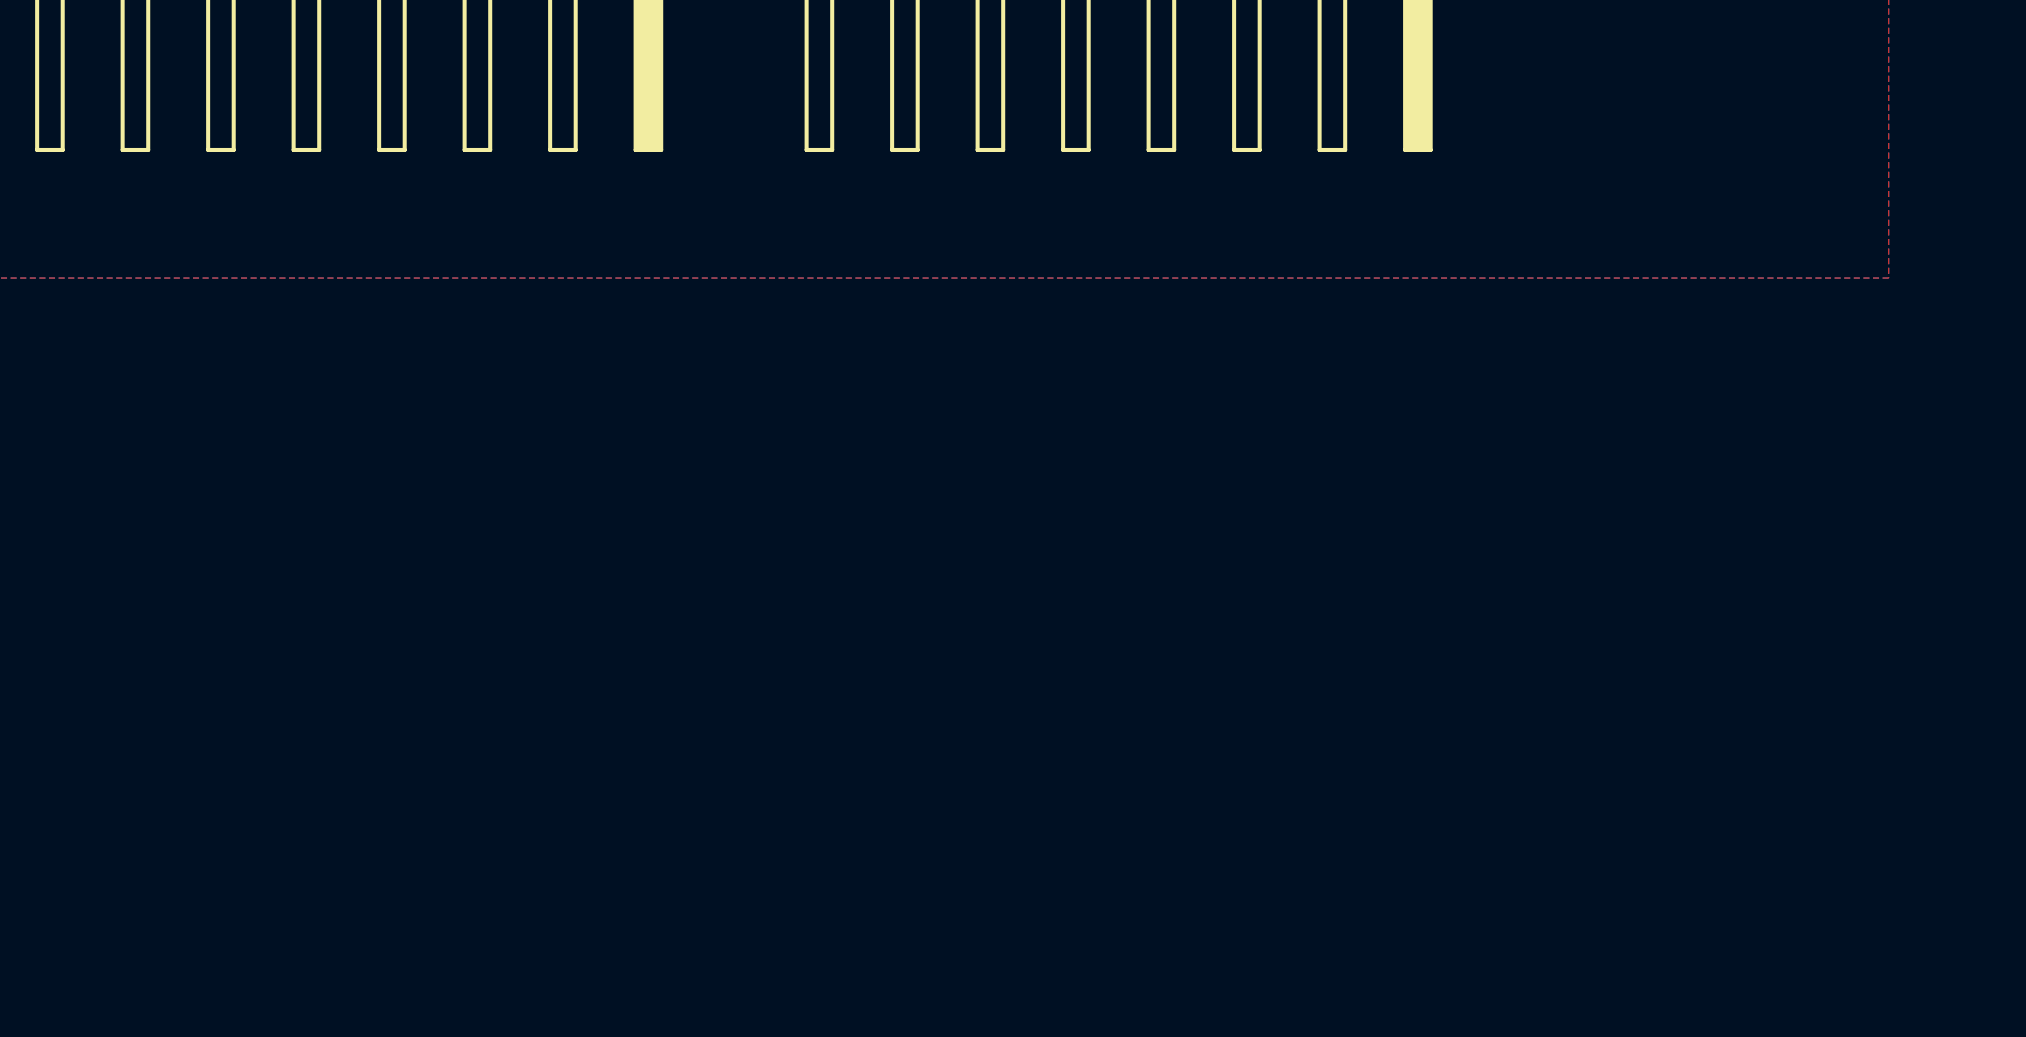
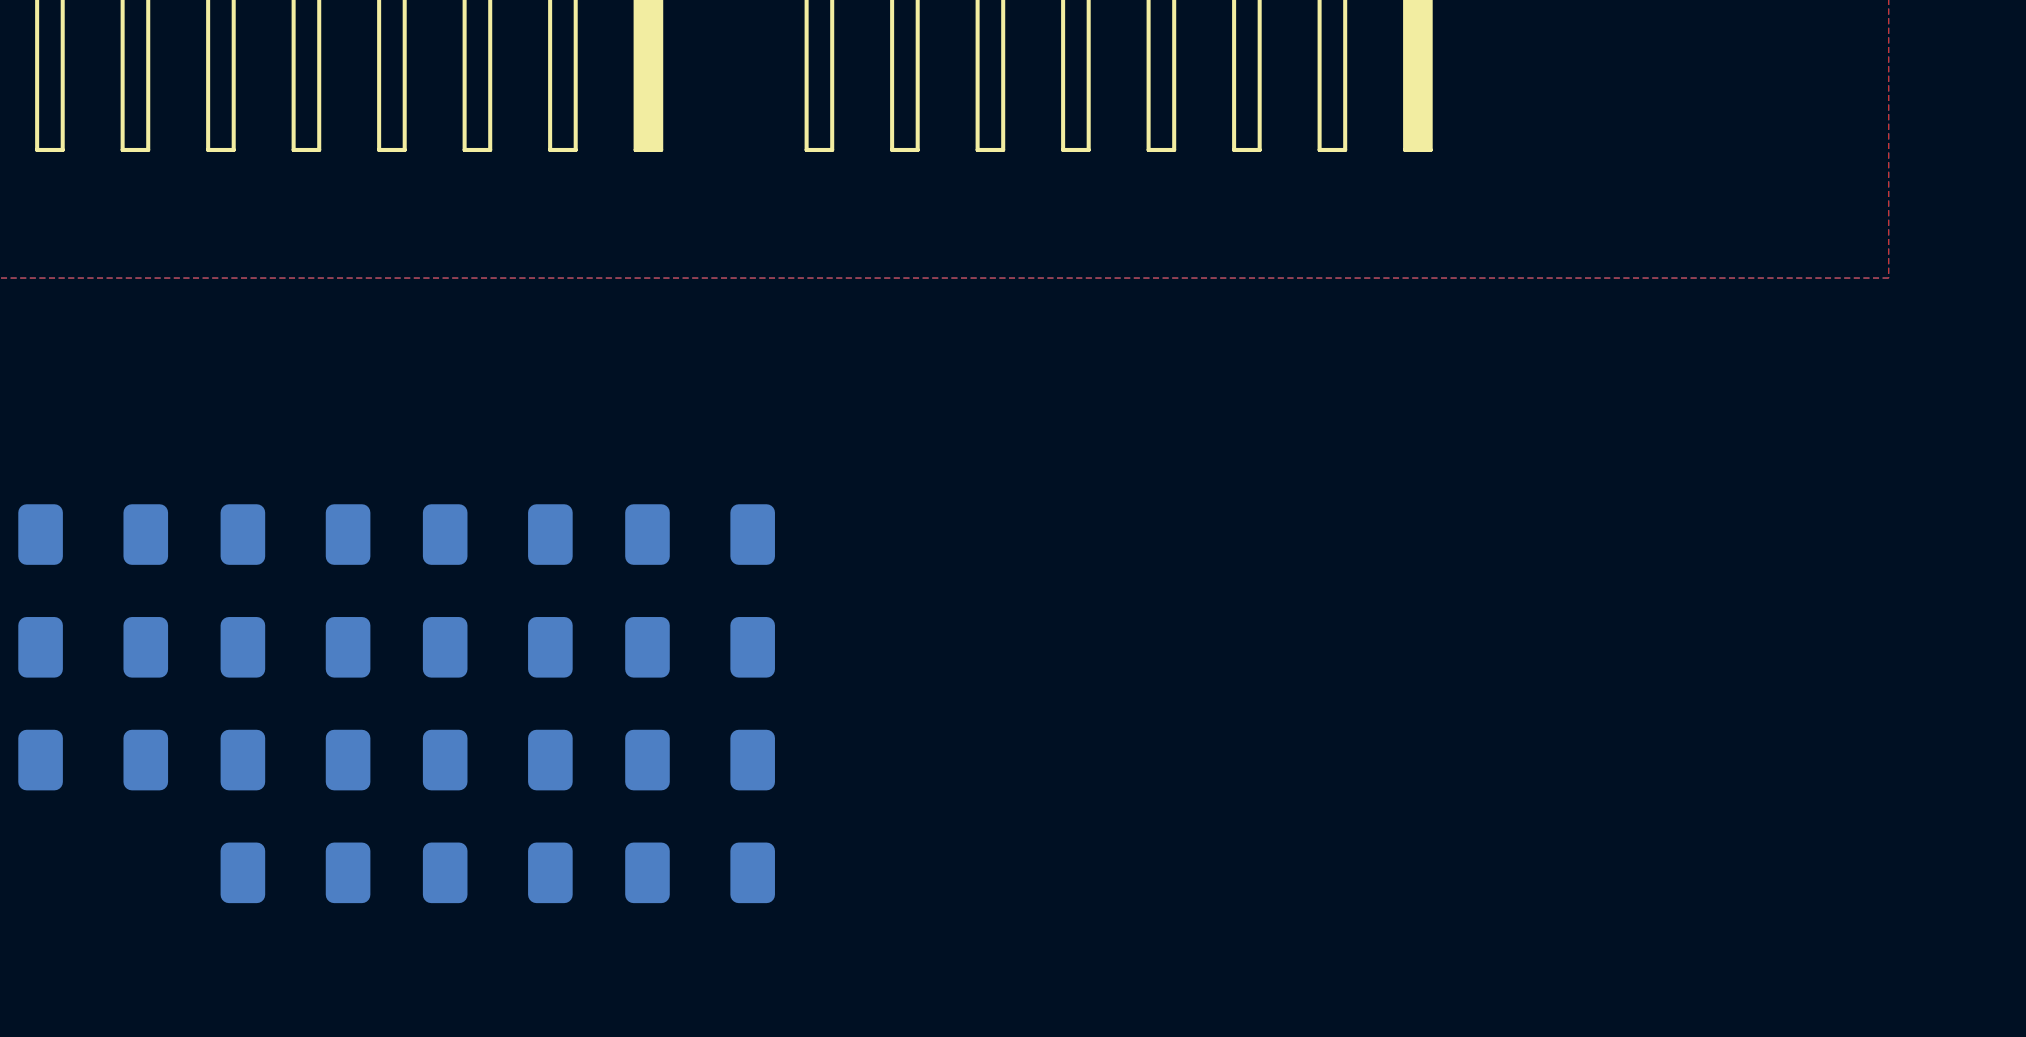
part: none -> (93, 534)
part: none -> (295, 534)
part: none -> (497, 534)
part: none -> (700, 534)
part: none -> (93, 647)
part: none -> (295, 647)
part: none -> (497, 647)
part: none -> (700, 647)
part: none -> (93, 760)
part: none -> (295, 760)
part: none -> (497, 760)
part: none -> (700, 760)
part: none -> (295, 872)
part: none -> (497, 872)
part: none -> (700, 872)

